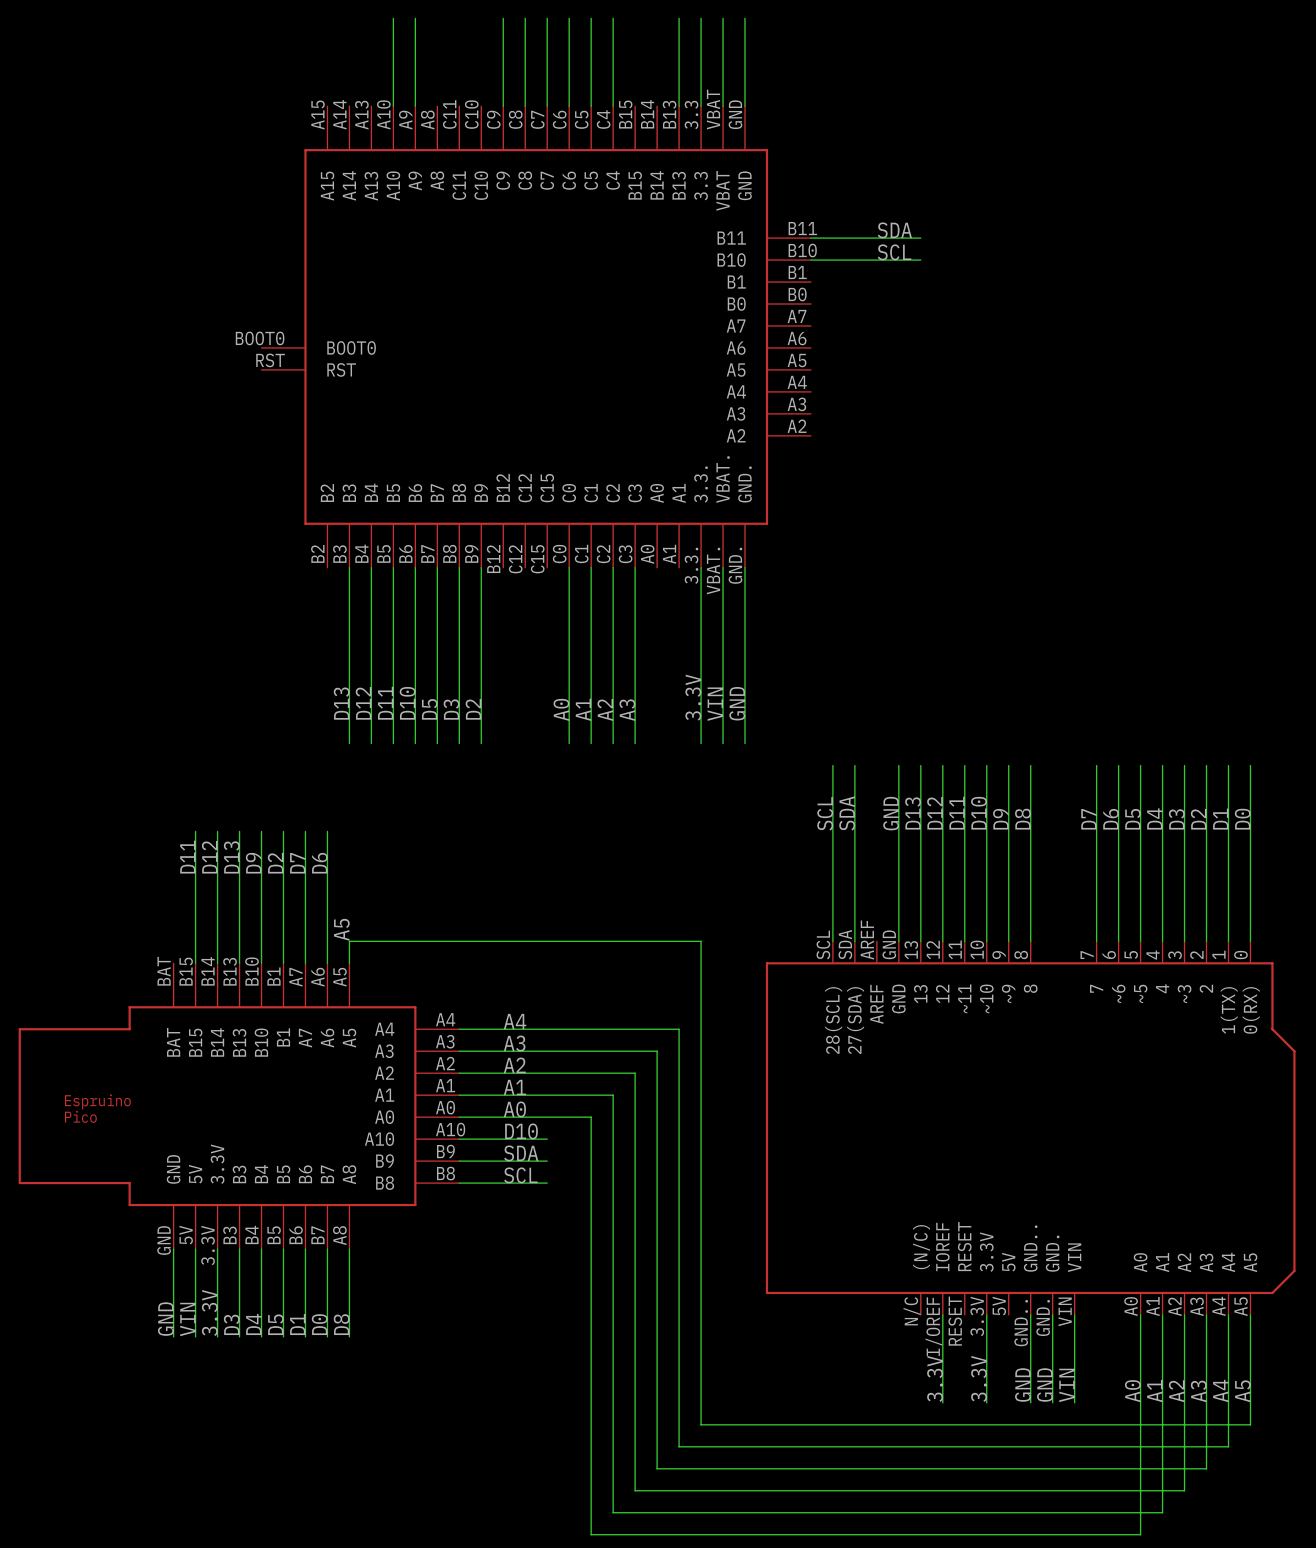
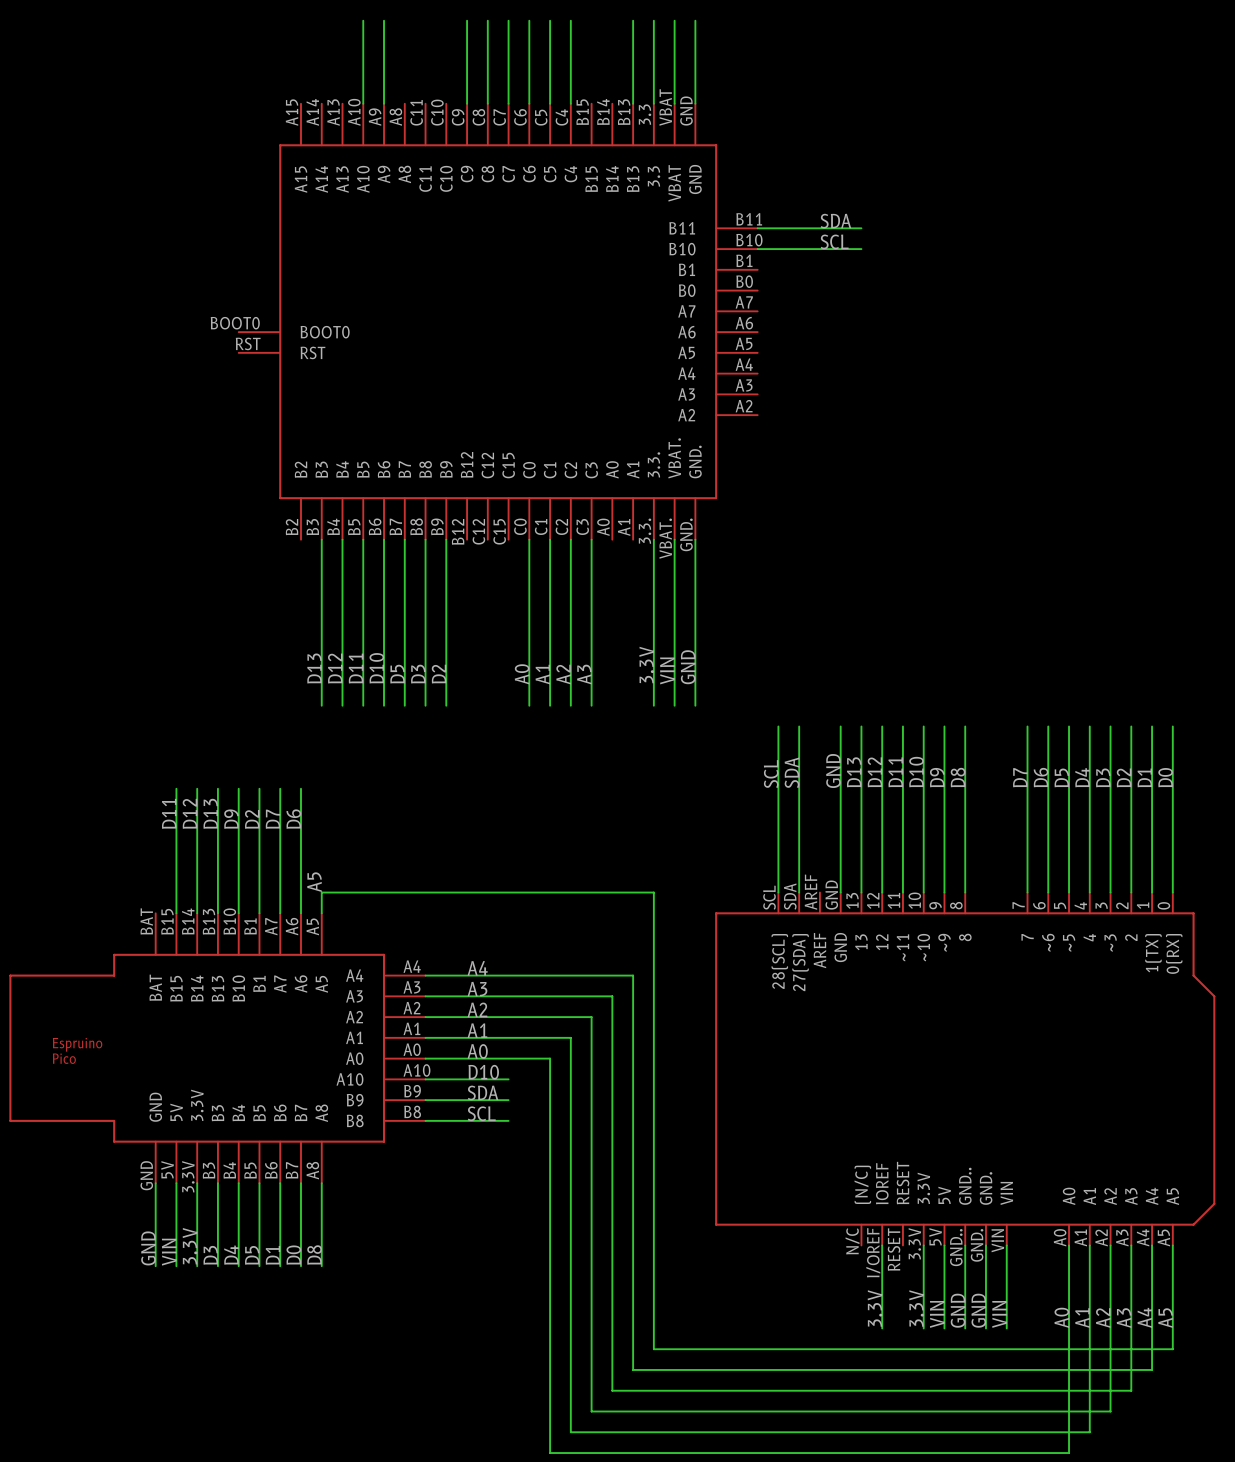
wire: none -> (944, 1245) (944, 1328)
label: none -> VIN (937, 1314)

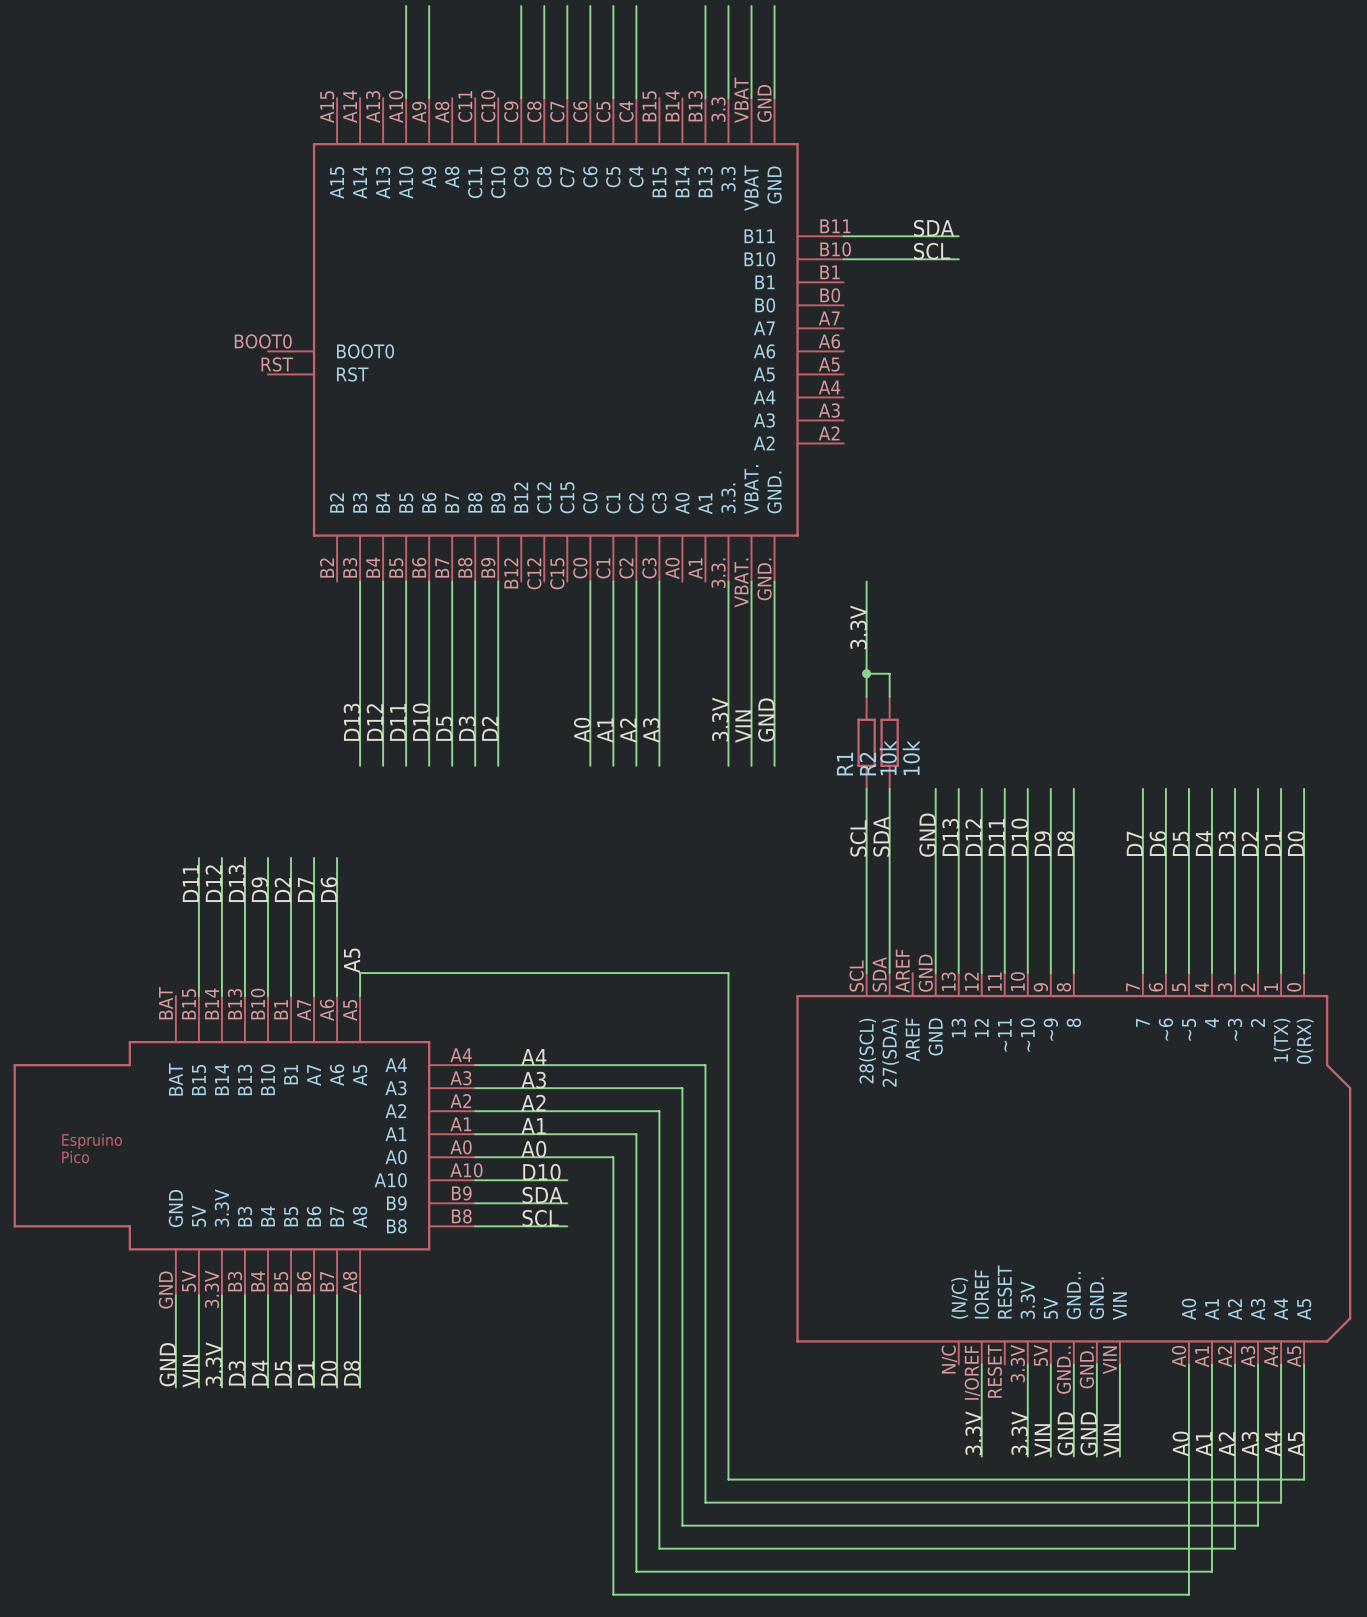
wire: none -> (866, 581) (866, 696)
label: none -> 3.3V (858, 627)
wire: none -> (866, 673) (889, 673) (889, 696)
junction: none -> (866, 673)
R1: none -> 10k (866, 742)
R2: none -> 10k (889, 742)

